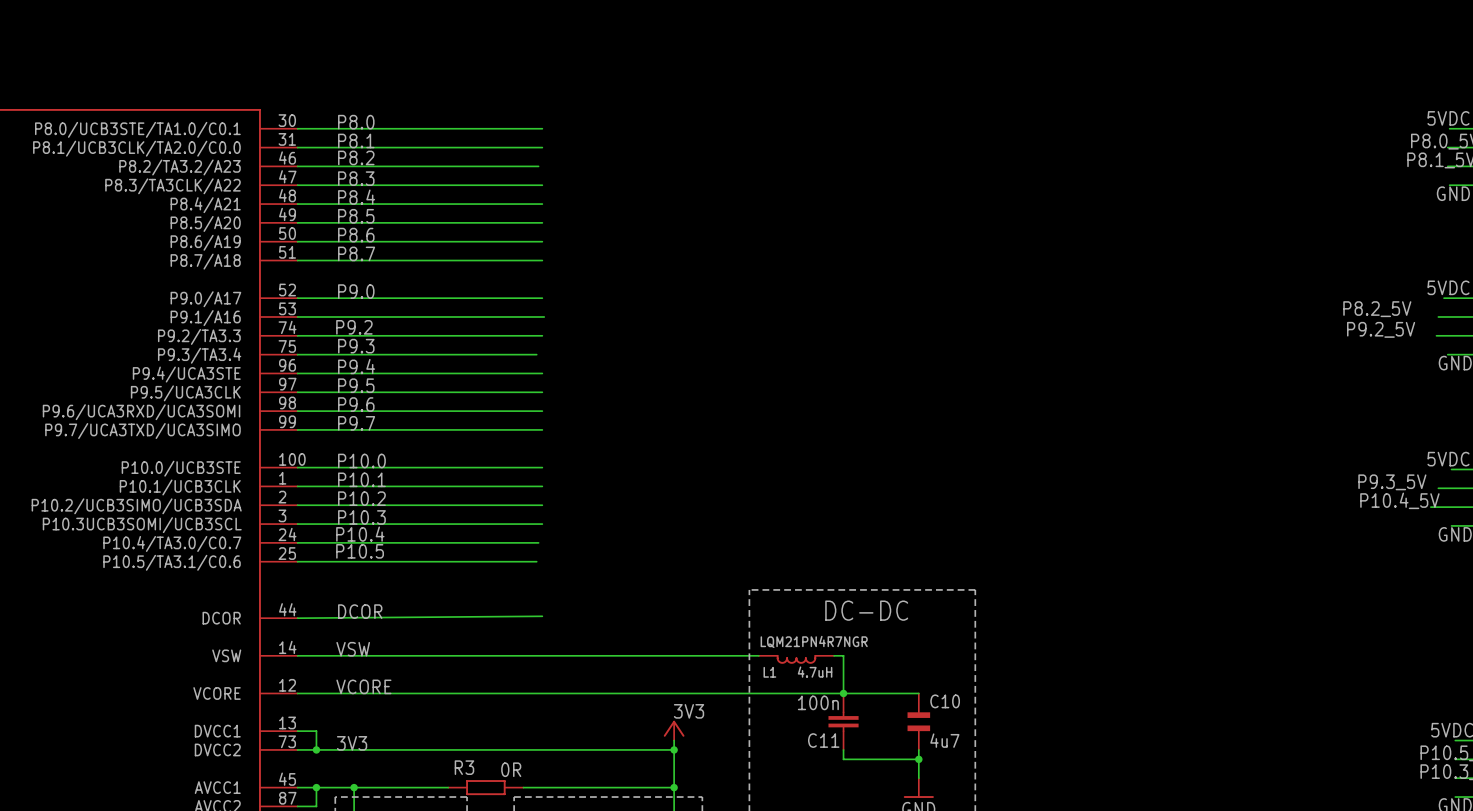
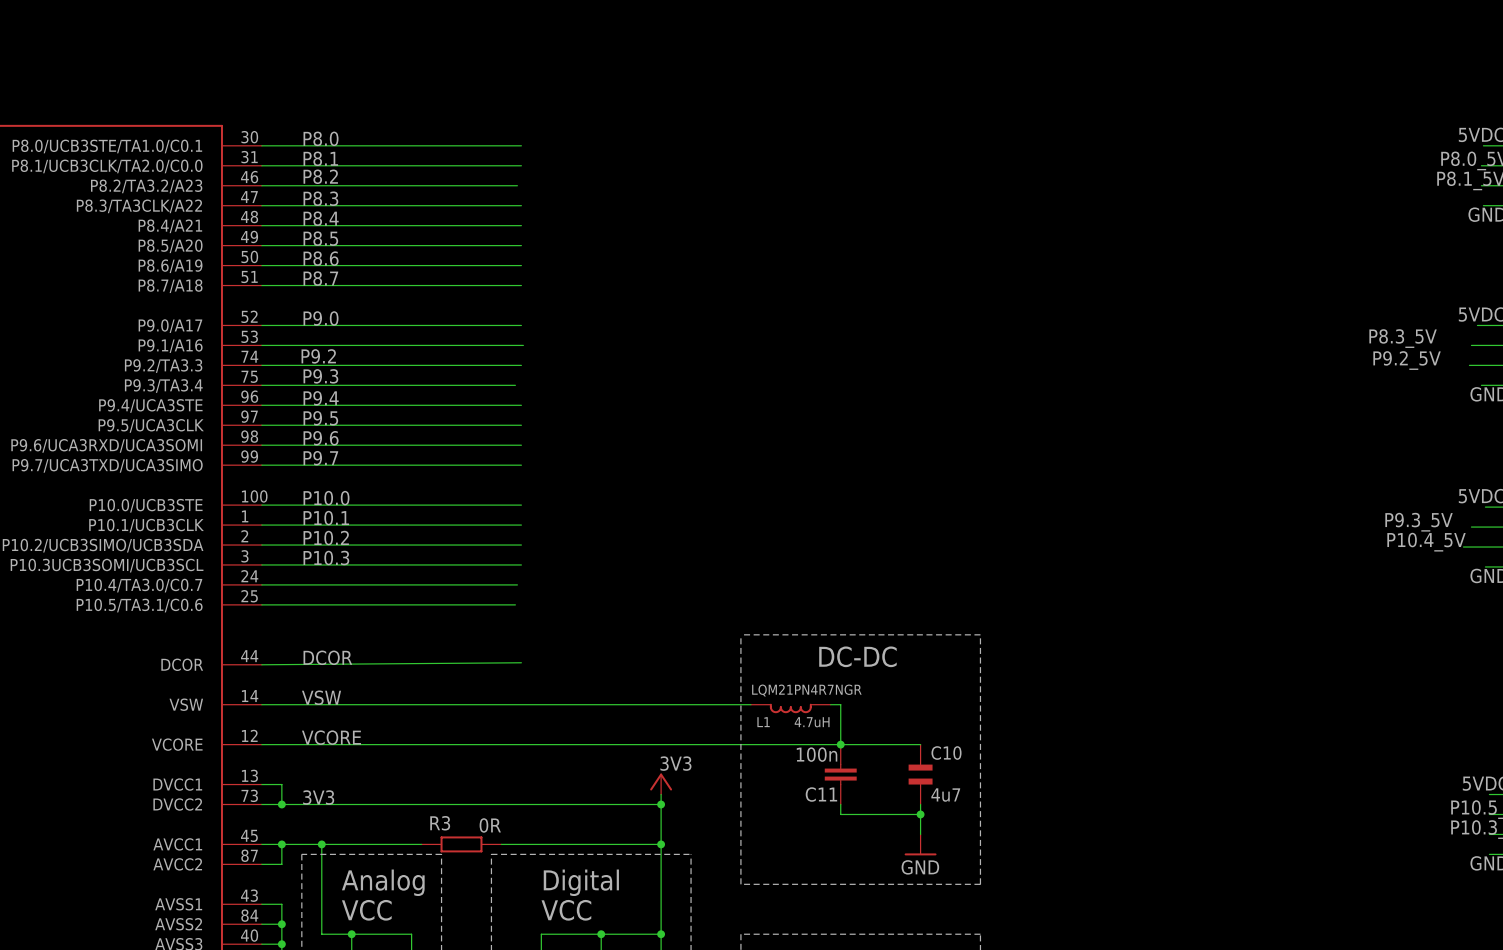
label: P8.2_5V (1377, 309) -> P8.3_5V (1403, 338)
label: P10.4 (360, 534) -> none
label: P10.5 (360, 551) -> none

